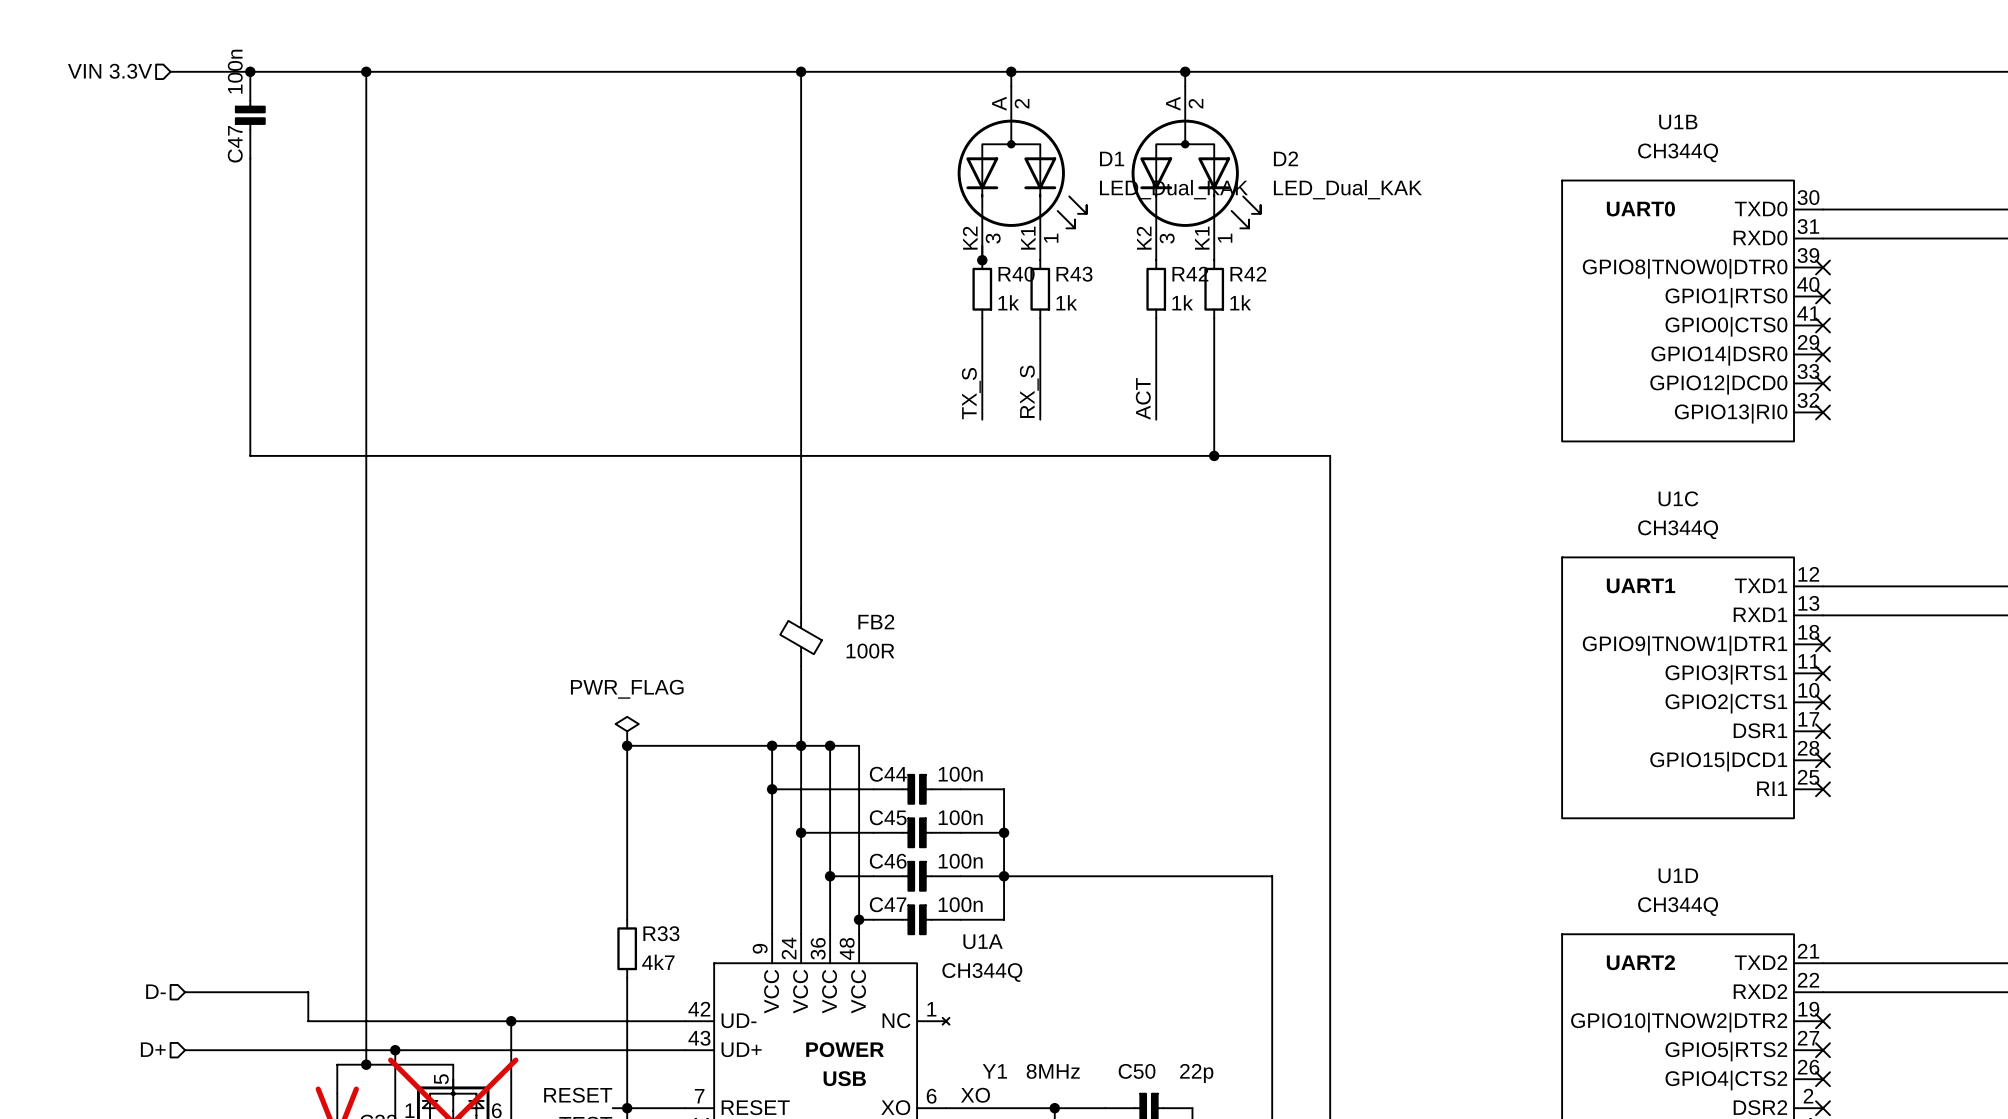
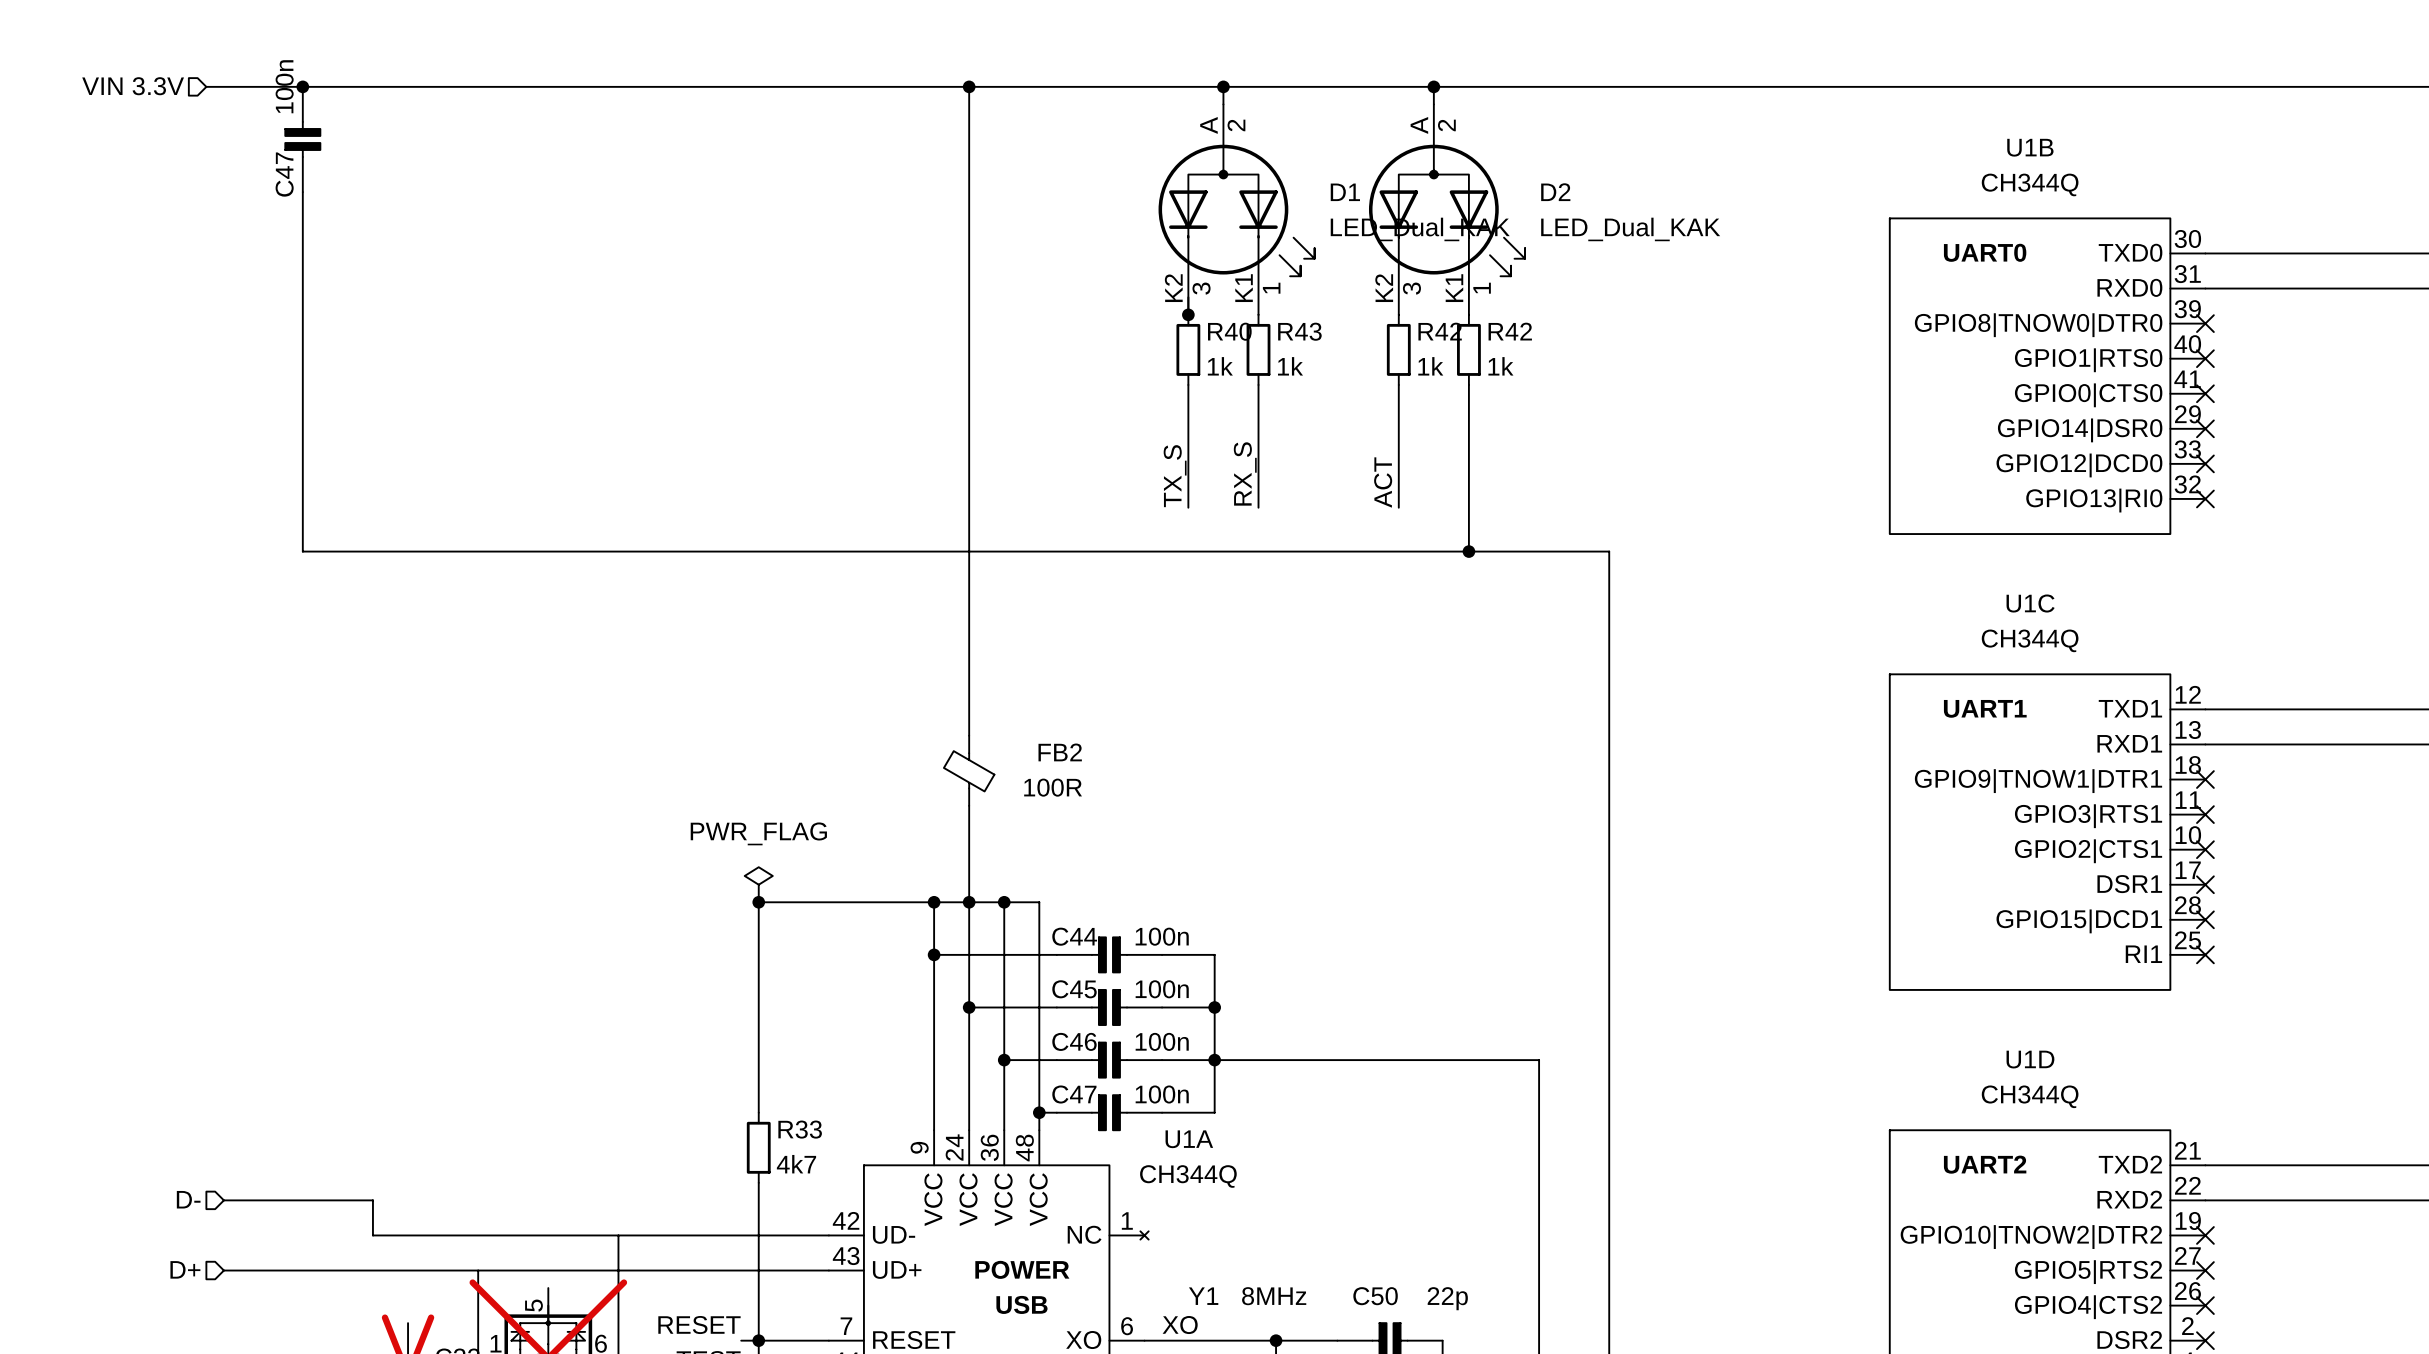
wire: (366, 71) (366, 1064) -> none
junction: (366, 71) -> none
junction: (511, 1021) -> none
junction: (395, 1050) -> none
junction: (366, 1064) -> none
wire: (453, 1064) (337, 1064) (337, 1093) -> none

